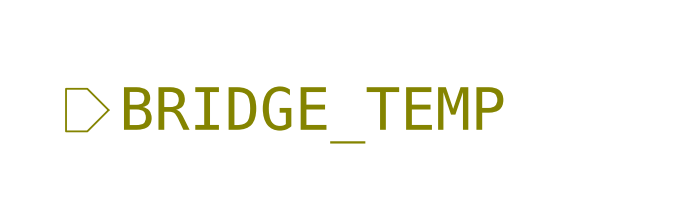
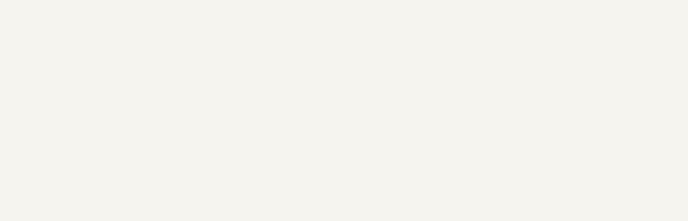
hierarchical label: BRIDGE_TEMP (313, 114) -> none

